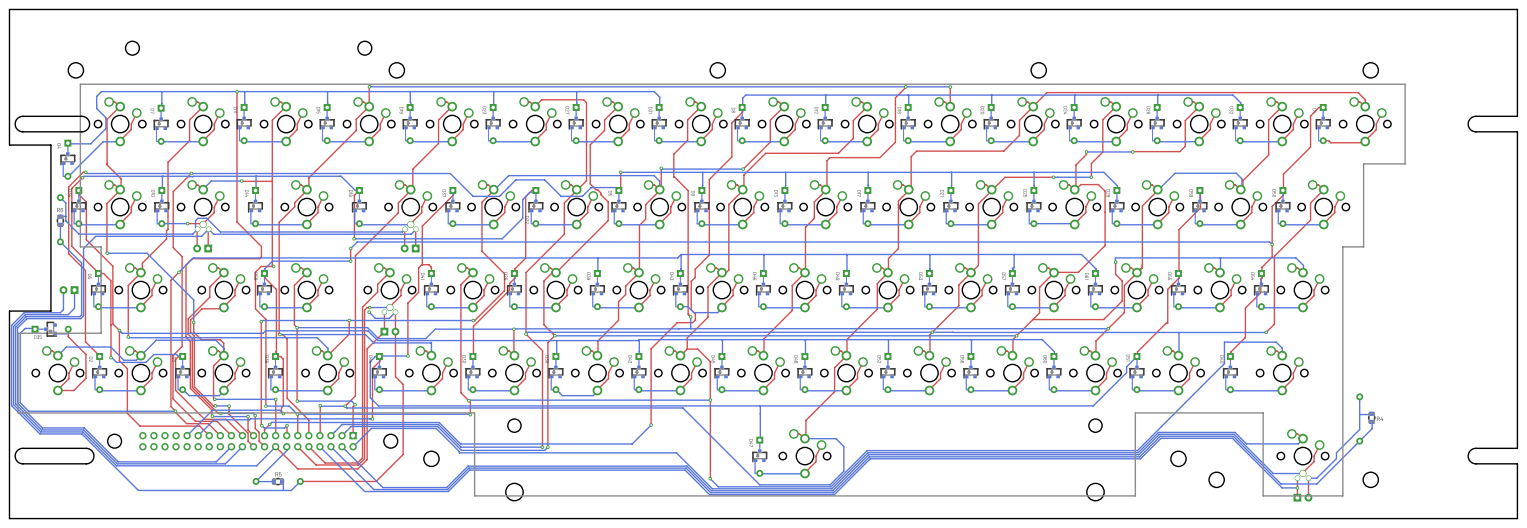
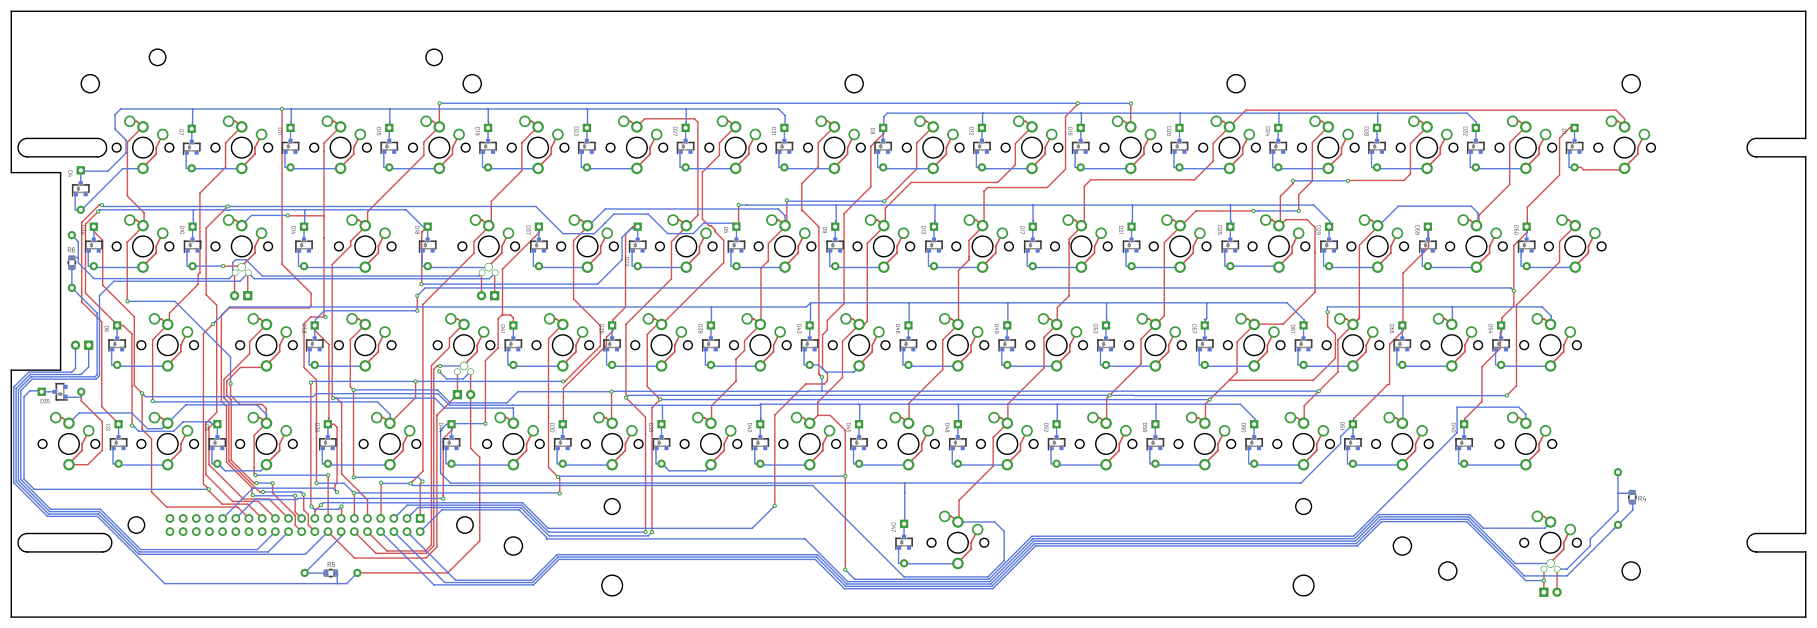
line: (1135, 495) (1135, 412) (1263, 412) (1263, 495) (1342, 495) (1342, 246) (1363, 246) (1363, 163) (1405, 163) (1405, 84) (80, 84) (80, 246) (101, 246) (101, 333) (18, 333) (18, 412) (474, 412) (474, 495) -> none
line: (1135, 495) (474, 495) -> none

